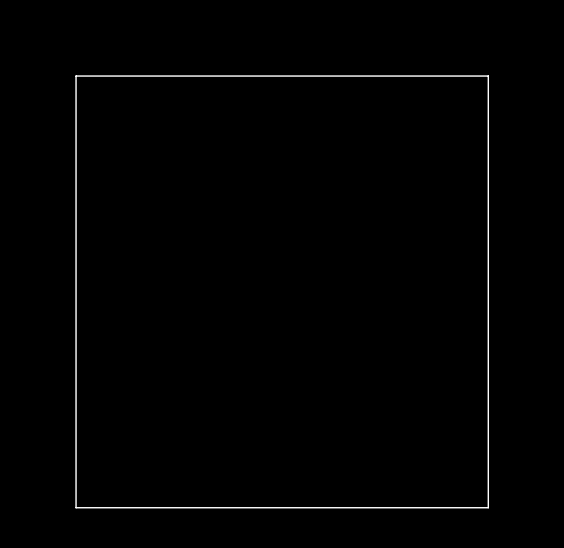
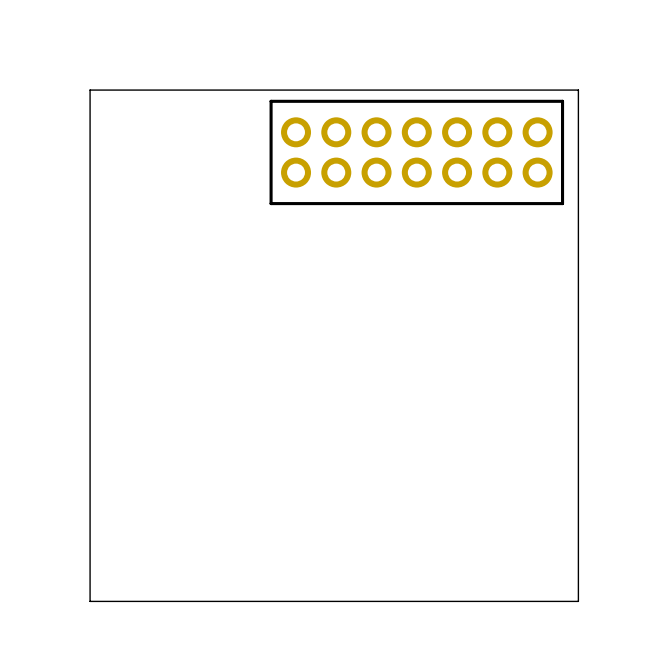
part: none -> (416, 152)

